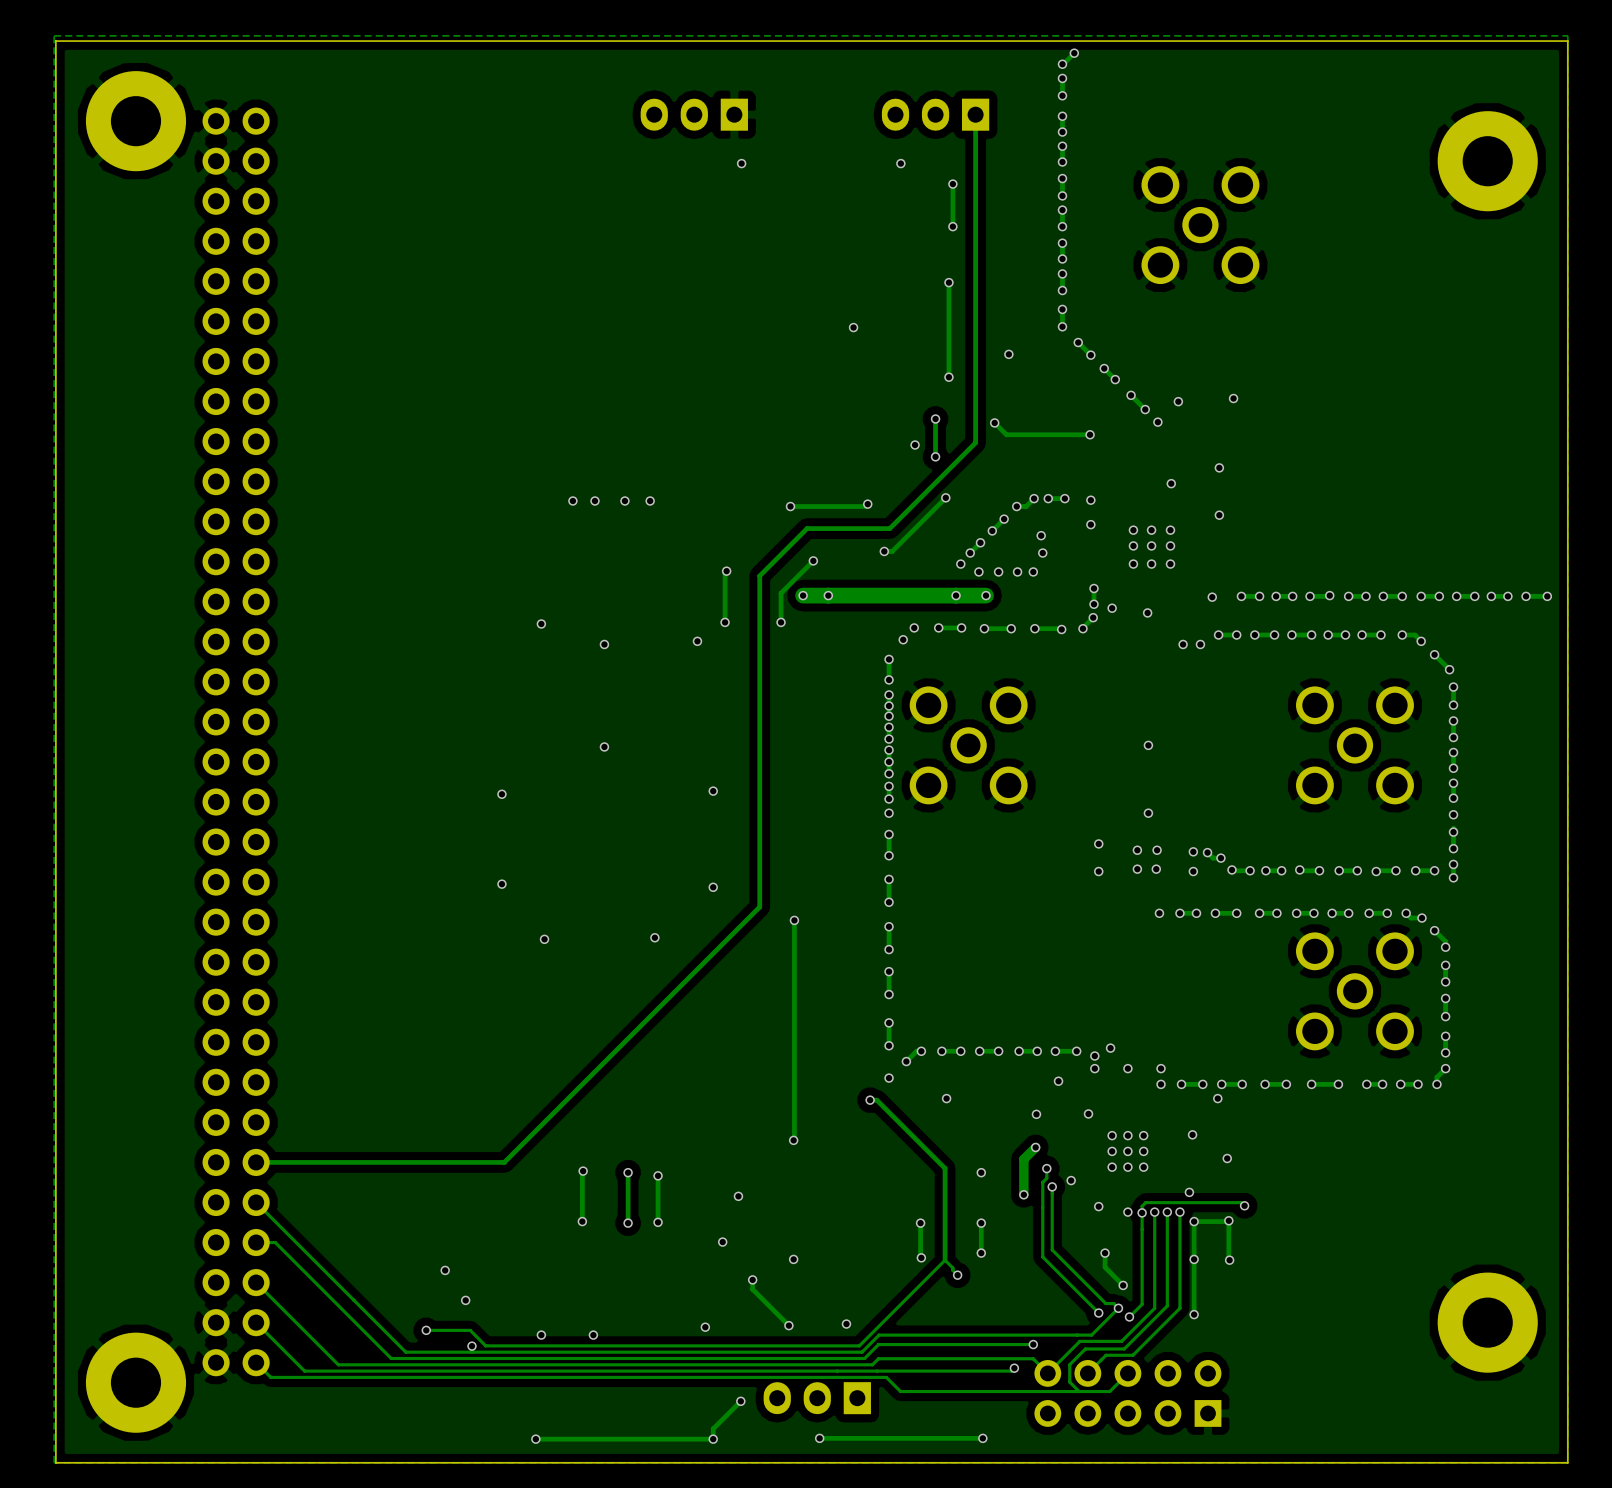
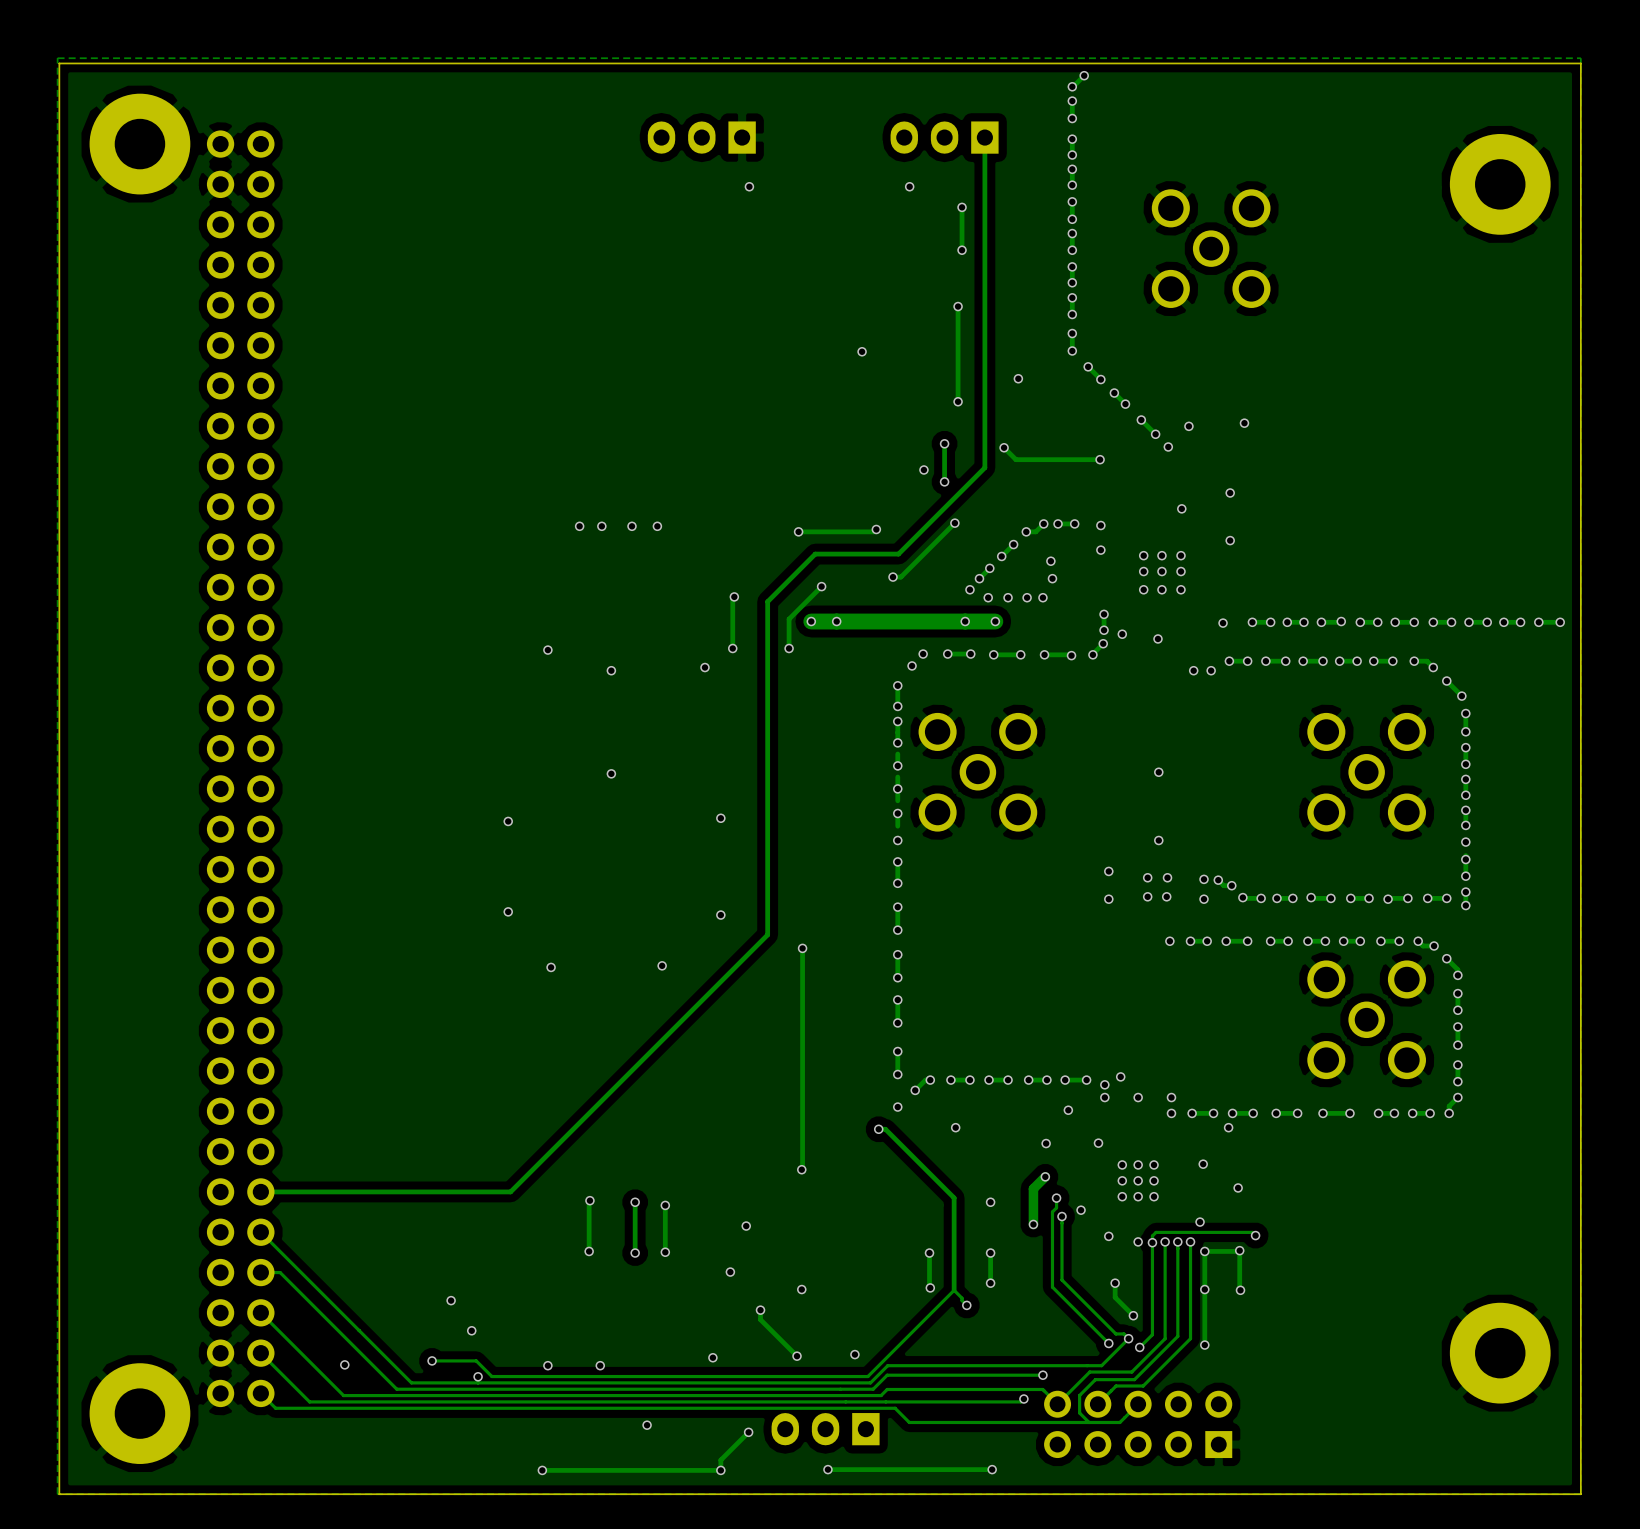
via: (889, 705) -> none
via: (889, 727) -> none
via: (889, 750) -> none
via: (889, 773) -> none
via: (889, 799) -> none
via: none -> (344, 1364)
via: none -> (647, 1425)

